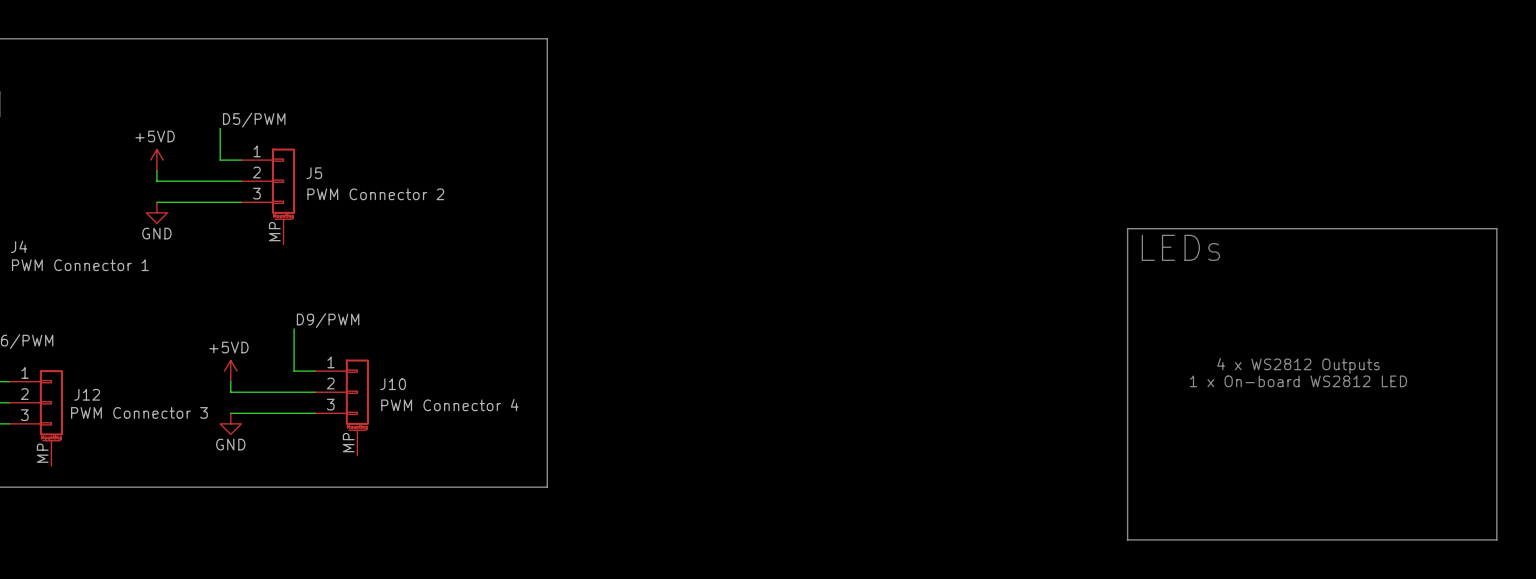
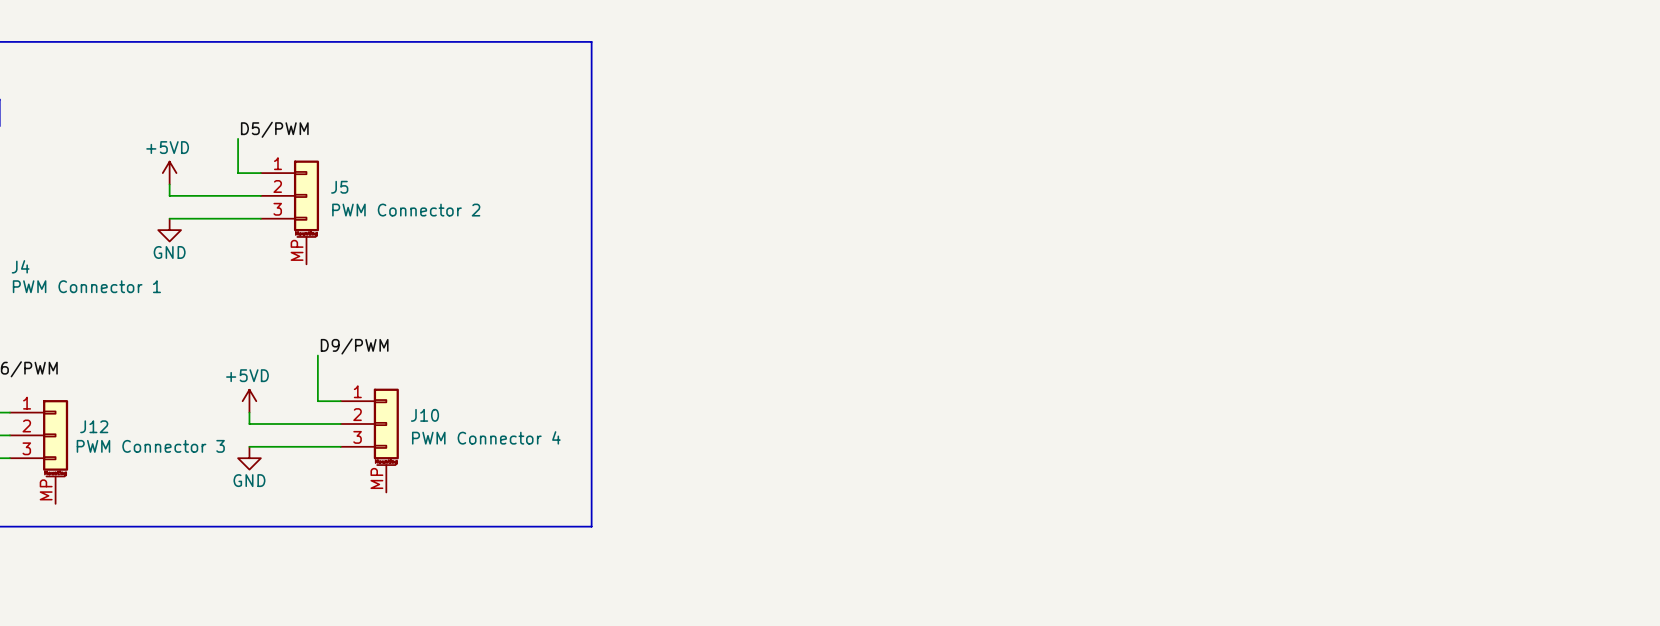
line: (1127, 228) (1496, 228) (1496, 539) (1127, 539) (1127, 228) -> none
text: LEDs (1180, 247) -> none
text: 4 x WS2812 Outputs (1298, 365) -> none
text: 1 x On-board WS2812 LED (1298, 381) -> none

